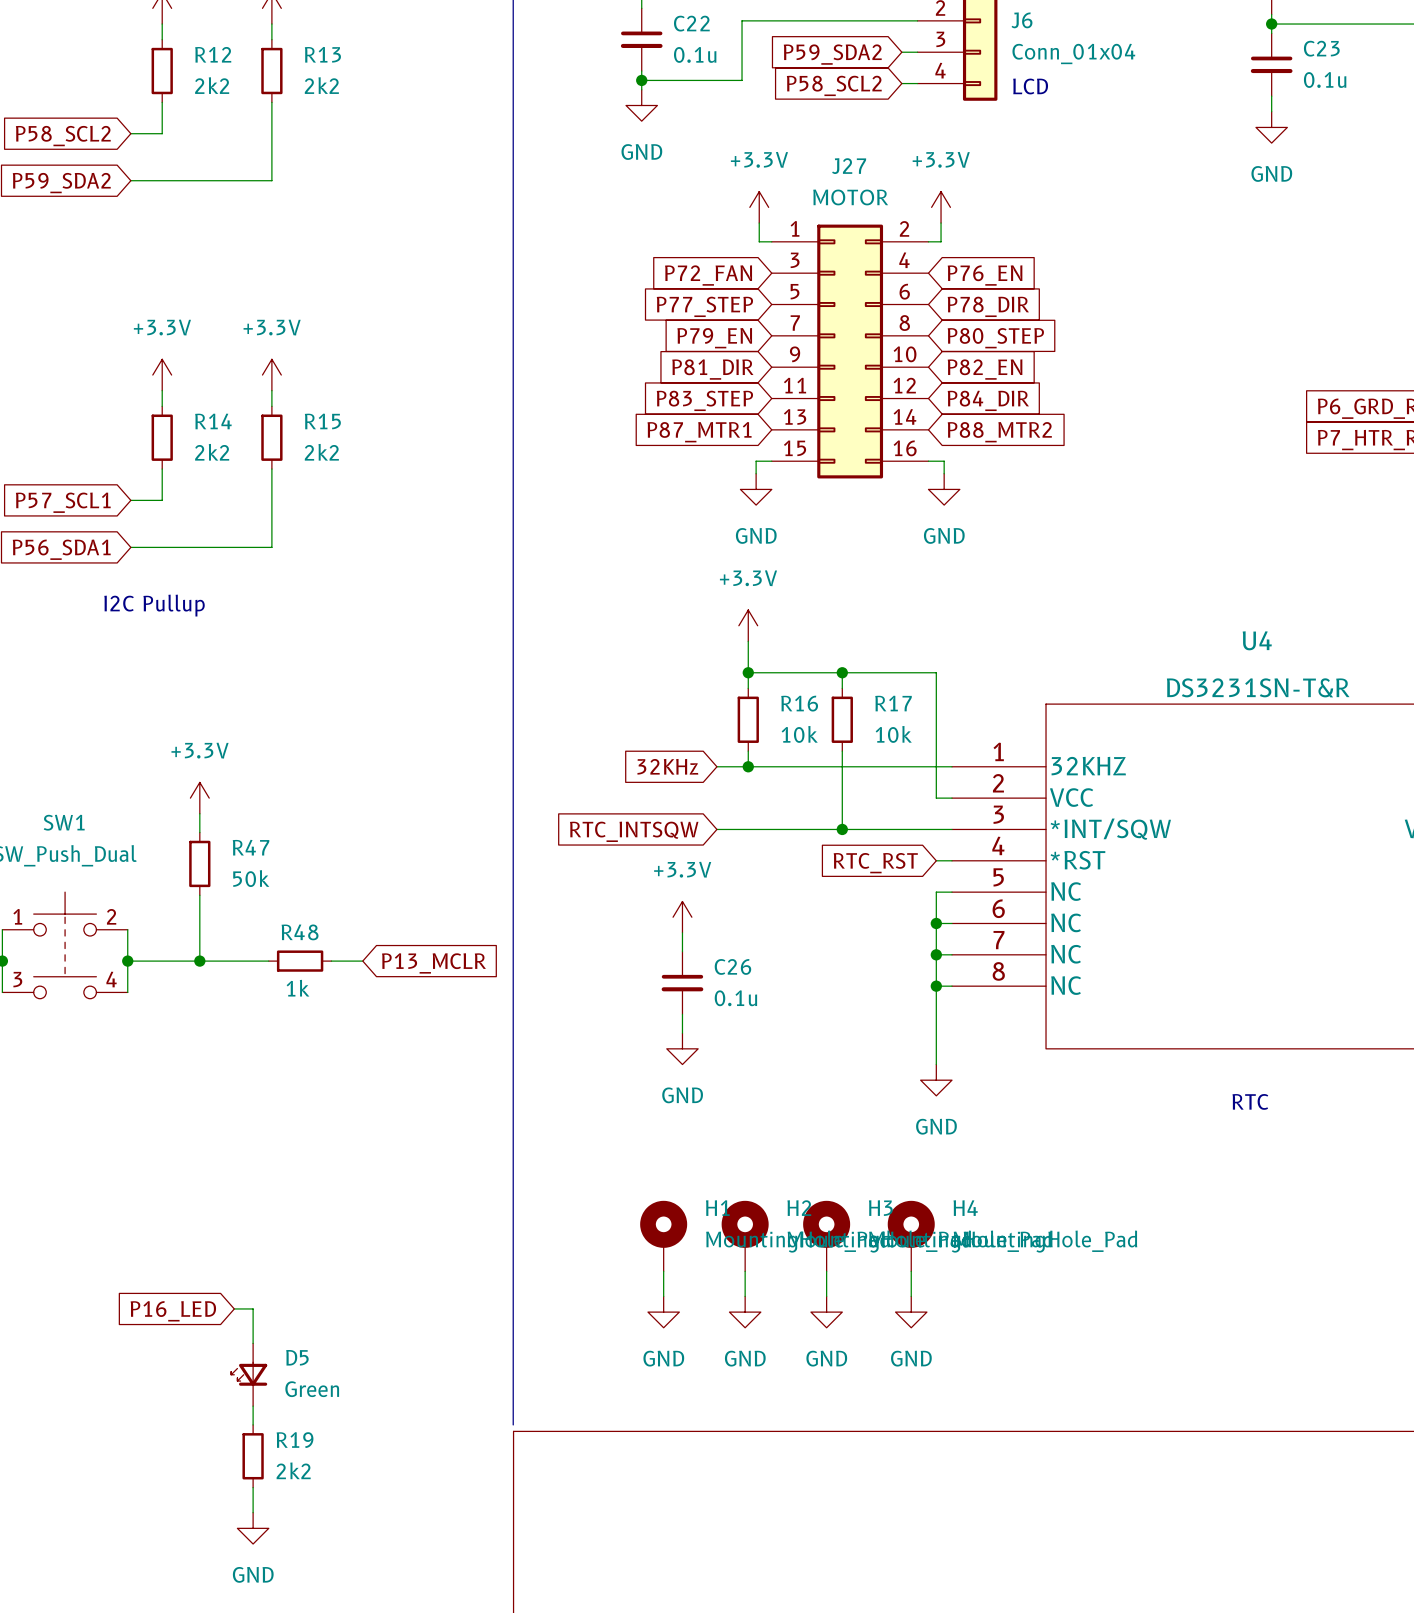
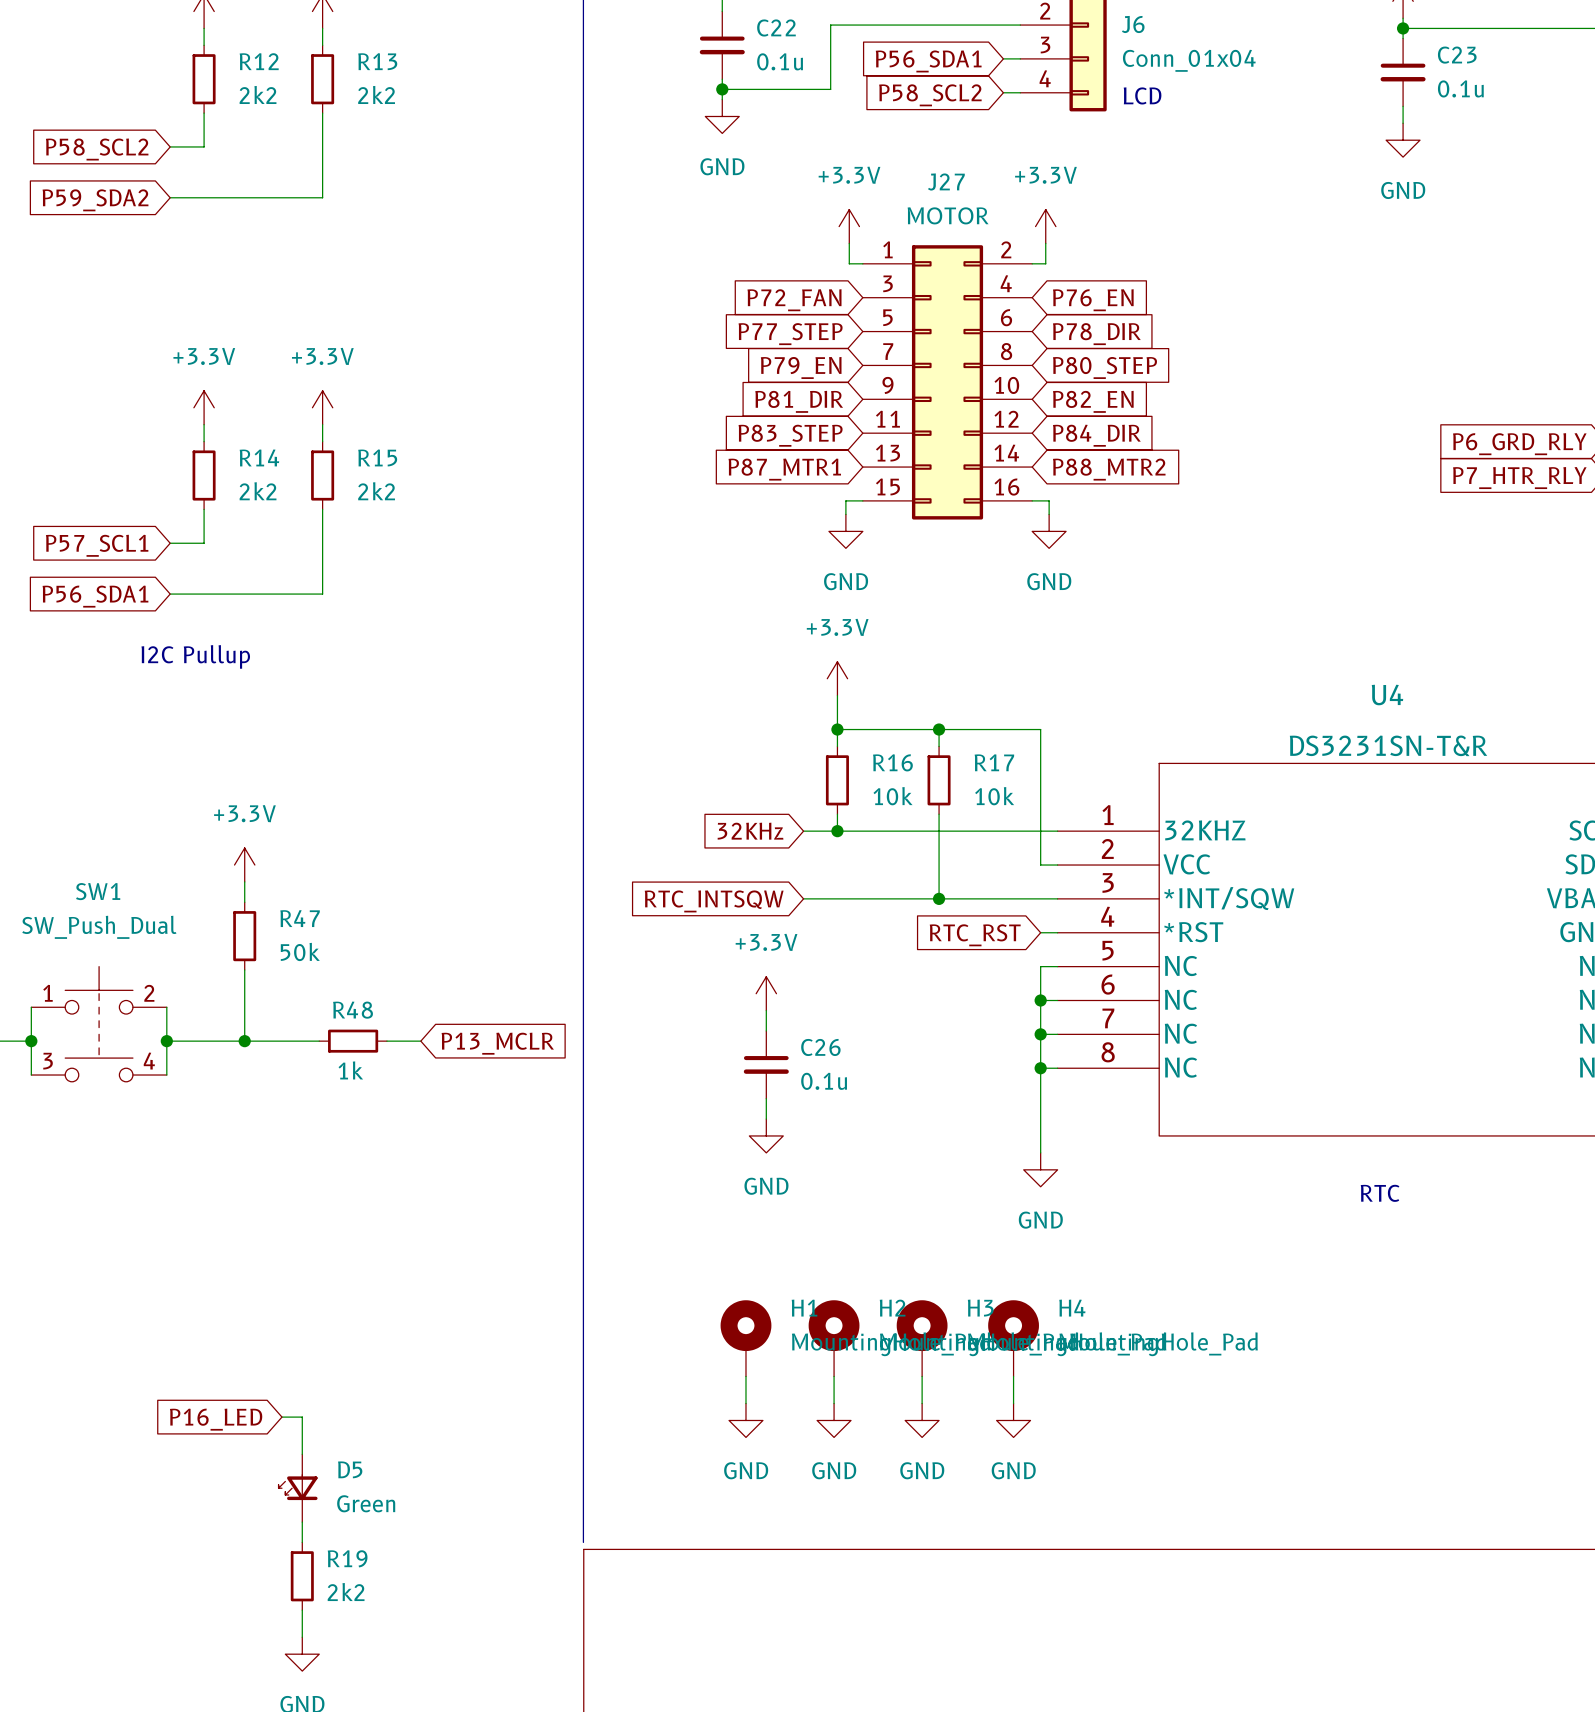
global label: P59_SDA2 (832, 54) -> P56_SDA1 (928, 61)

